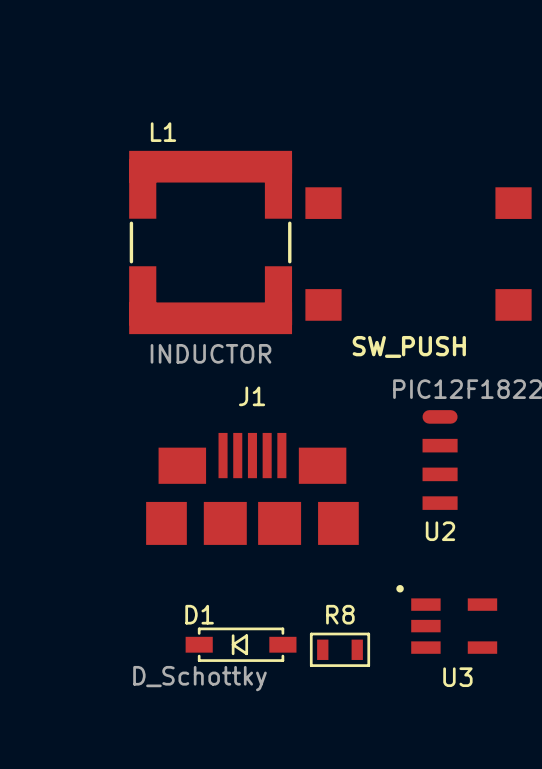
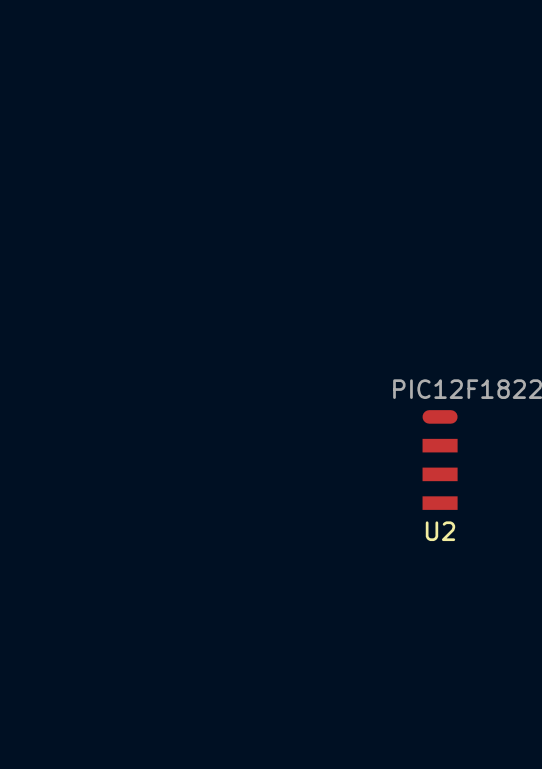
L1: INDUCTOR (210, 242) -> none
part: SW_PUSH (418, 254) -> none
J1: (252, 488) -> none
U3: (446, 619) -> none
D1: D_Schottky (241, 644) -> none
R8: (340, 649) -> none

